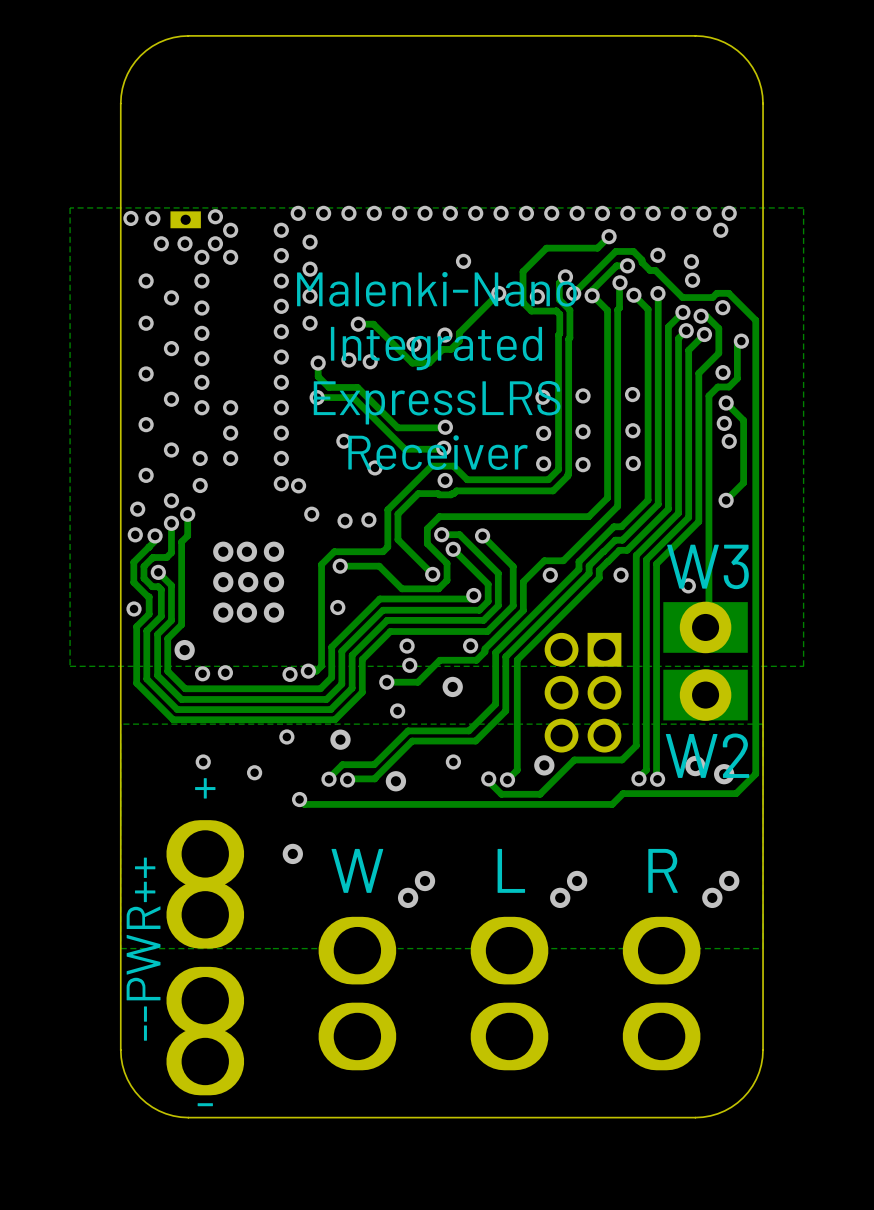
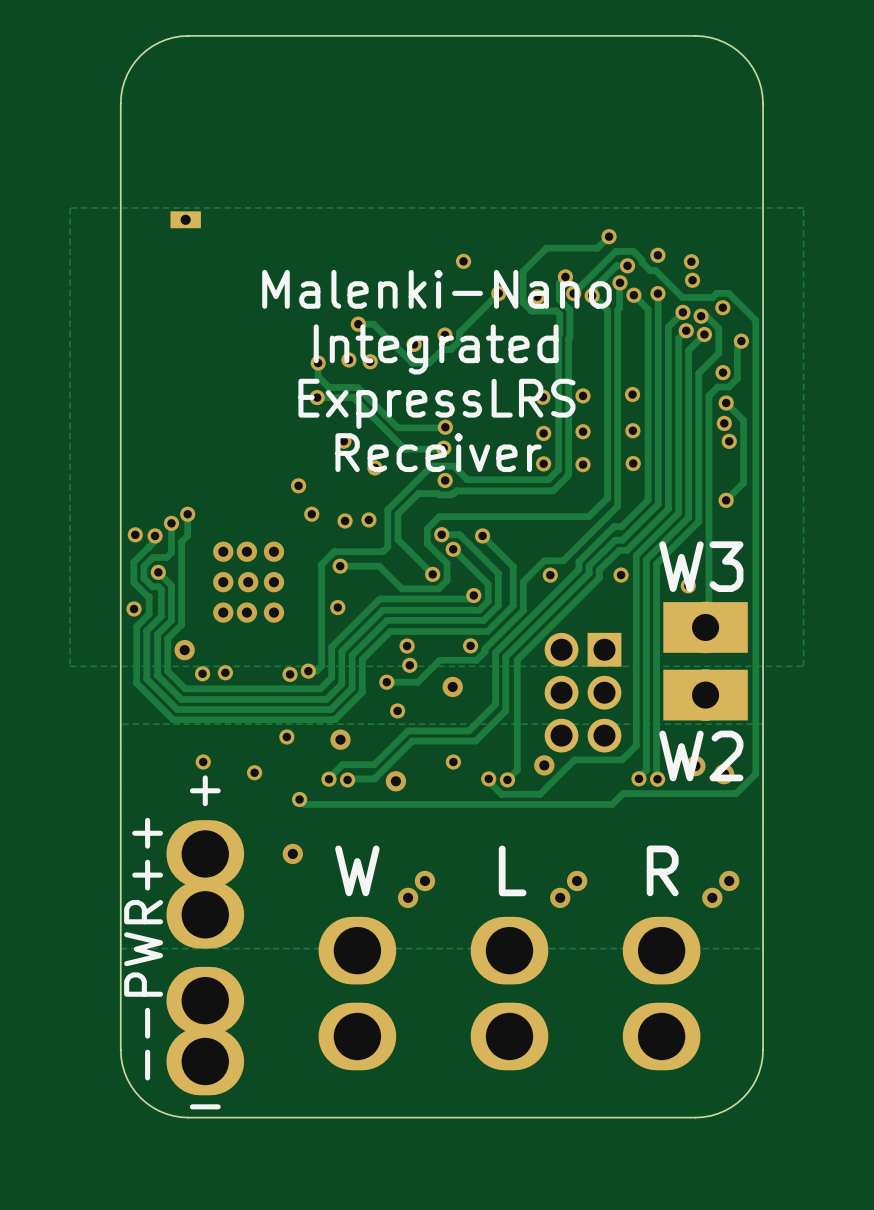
via: (298, 213) -> none
via: (323, 213) -> none
via: (348, 213) -> none
via: (374, 213) -> none
via: (399, 213) -> none
via: (425, 213) -> none
via: (450, 213) -> none
via: (475, 213) -> none
via: (501, 213) -> none
via: (526, 213) -> none
via: (551, 213) -> none
via: (577, 213) -> none
via: (602, 213) -> none
via: (627, 213) -> none
via: (653, 213) -> none
via: (678, 213) -> none
via: (703, 213) -> none
via: (729, 213) -> none
via: (215, 216) -> none
via: (130, 218) -> none
via: (152, 218) -> none
via: (230, 230) -> none
via: (281, 230) -> none
via: (720, 230) -> none
via: (310, 242) -> none
via: (161, 243) -> none
via: (184, 243) -> none
via: (215, 243) -> none
via: (281, 255) -> none
via: (201, 257) -> none
via: (230, 257) -> none
via: (310, 269) -> none
via: (146, 280) -> none
via: (201, 280) -> none
via: (281, 280) -> none
via: (310, 296) -> none
via: (171, 297) -> none
via: (281, 306) -> none
via: (201, 308) -> none
via: (146, 323) -> none
via: (310, 323) -> none
via: (281, 331) -> none
via: (201, 333) -> none
via: (171, 348) -> none
via: (281, 357) -> none
via: (201, 358) -> none
via: (146, 373) -> none
via: (201, 382) -> none
via: (281, 382) -> none
via: (171, 399) -> none
via: (201, 407) -> none
via: (230, 407) -> none
via: (281, 407) -> none
via: (146, 424) -> none
via: (230, 433) -> none
via: (281, 433) -> none
via: (171, 449) -> none
via: (200, 458) -> none
via: (230, 458) -> none
via: (281, 458) -> none
via: (146, 475) -> none
via: (281, 483) -> none
via: (200, 485) -> none
via: (171, 500) -> none
via: (137, 509) -> none

